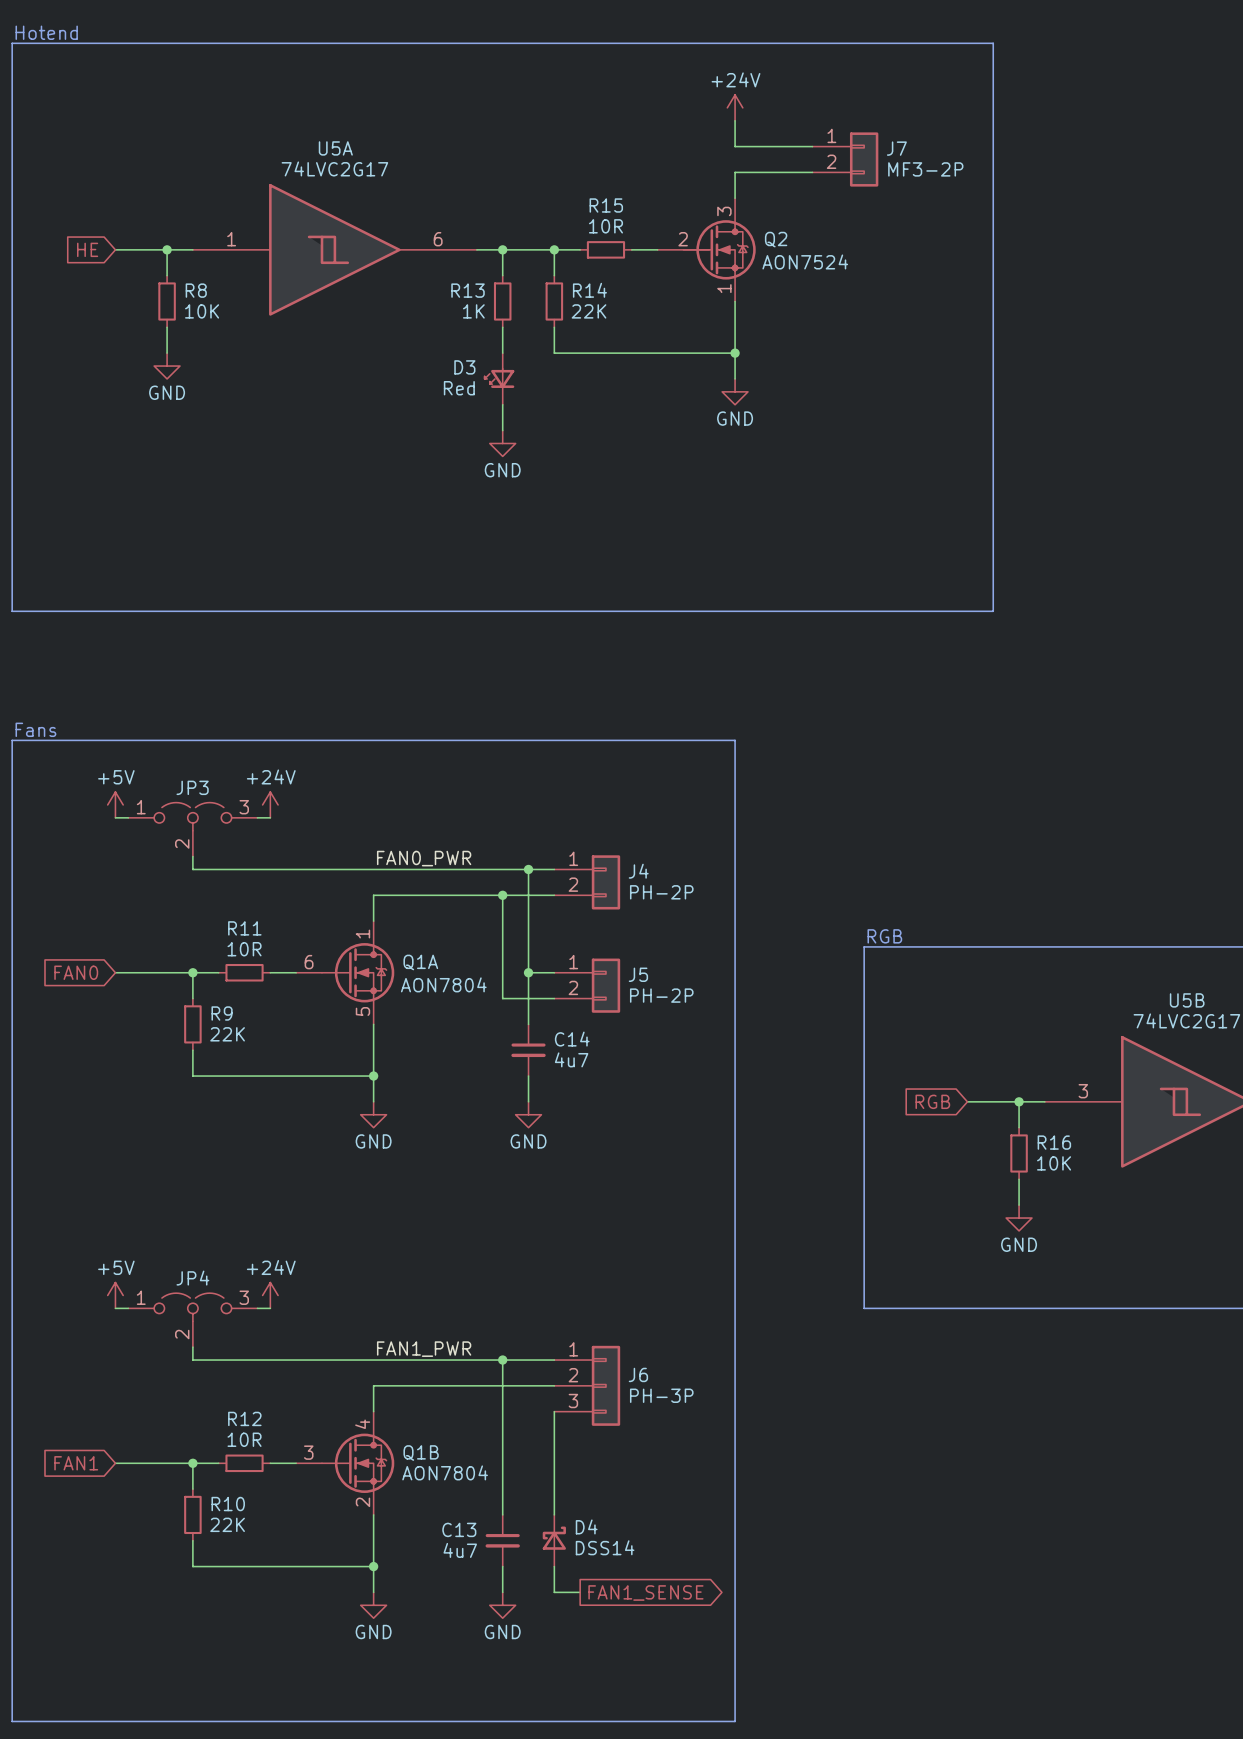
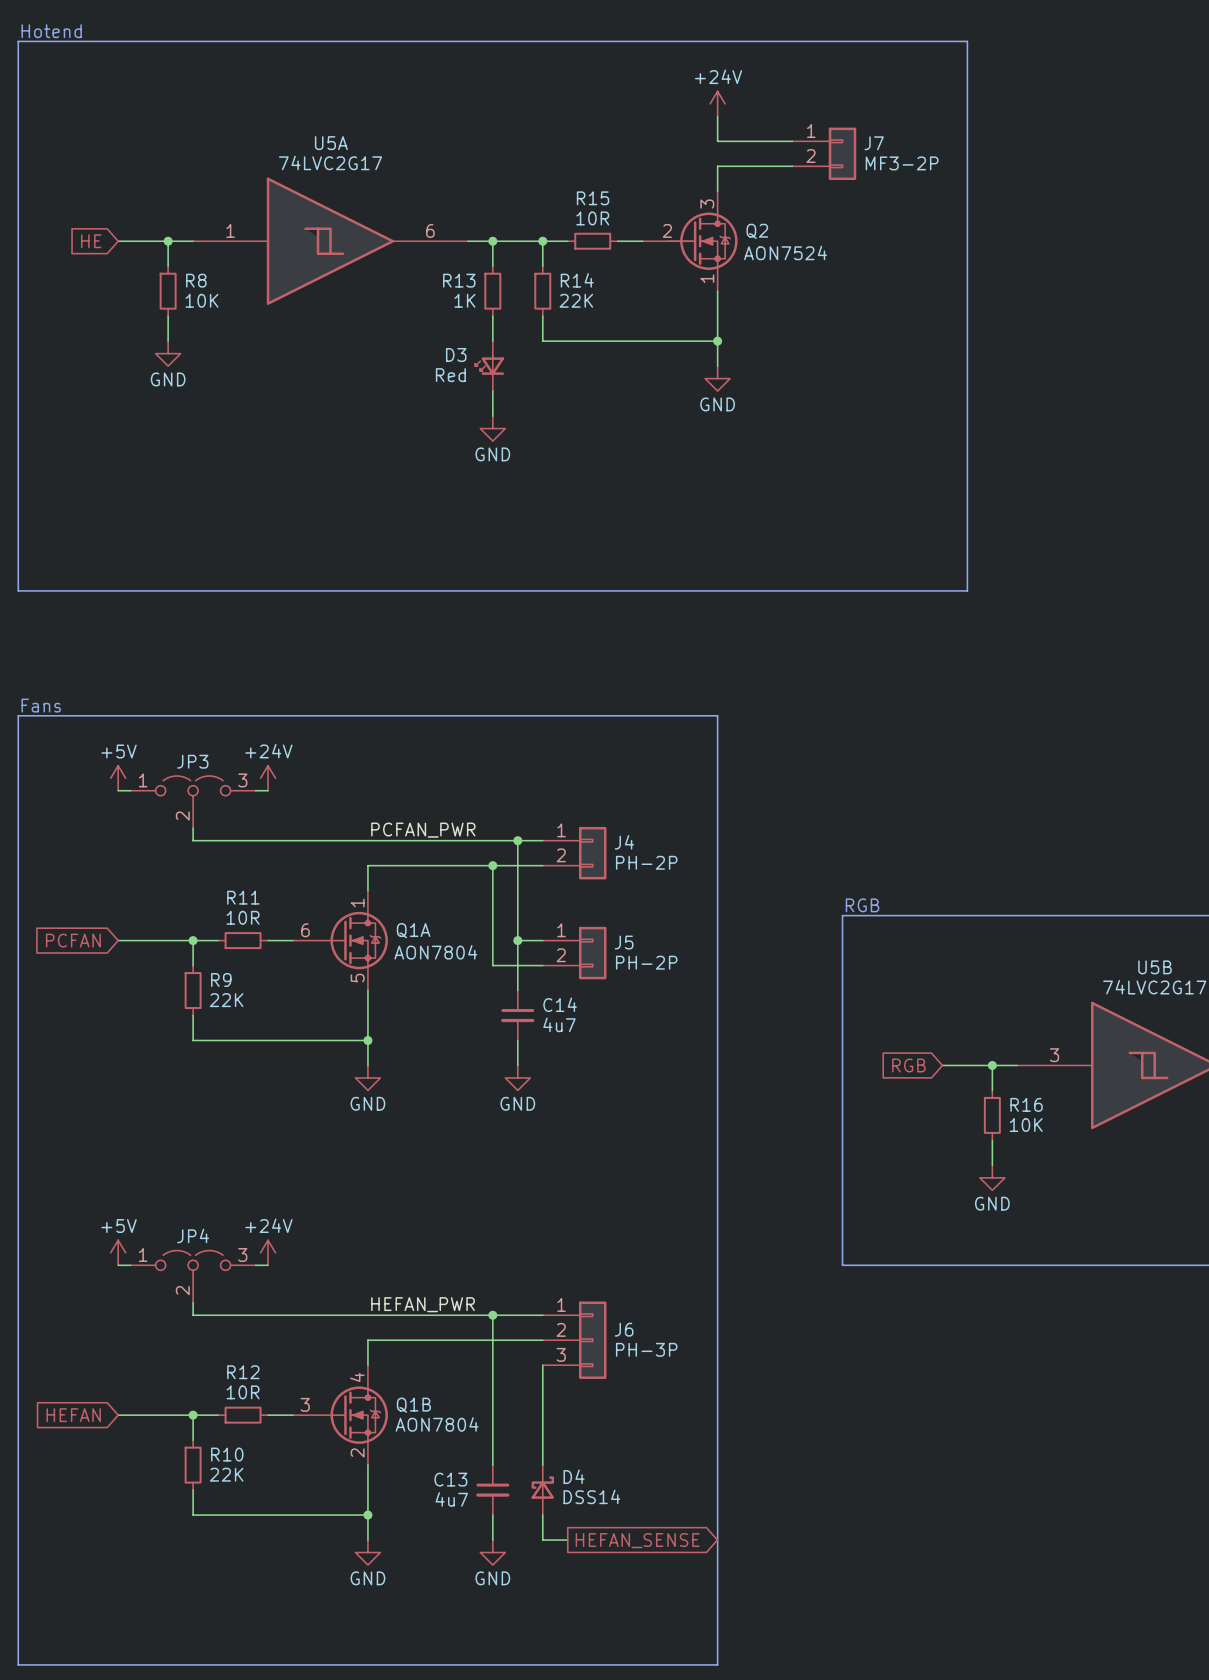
label: FAN0_PWR (424, 858) -> PCFAN_PWR (423, 830)
global label: FAN0 (76, 972) -> PCFAN (73, 940)
label: FAN1_PWR (424, 1349) -> HEFAN_PWR (423, 1304)
global label: FAN1 (76, 1463) -> HEFAN (73, 1415)
global label: FAN1_SENSE (645, 1592) -> HEFAN_SENSE (637, 1540)

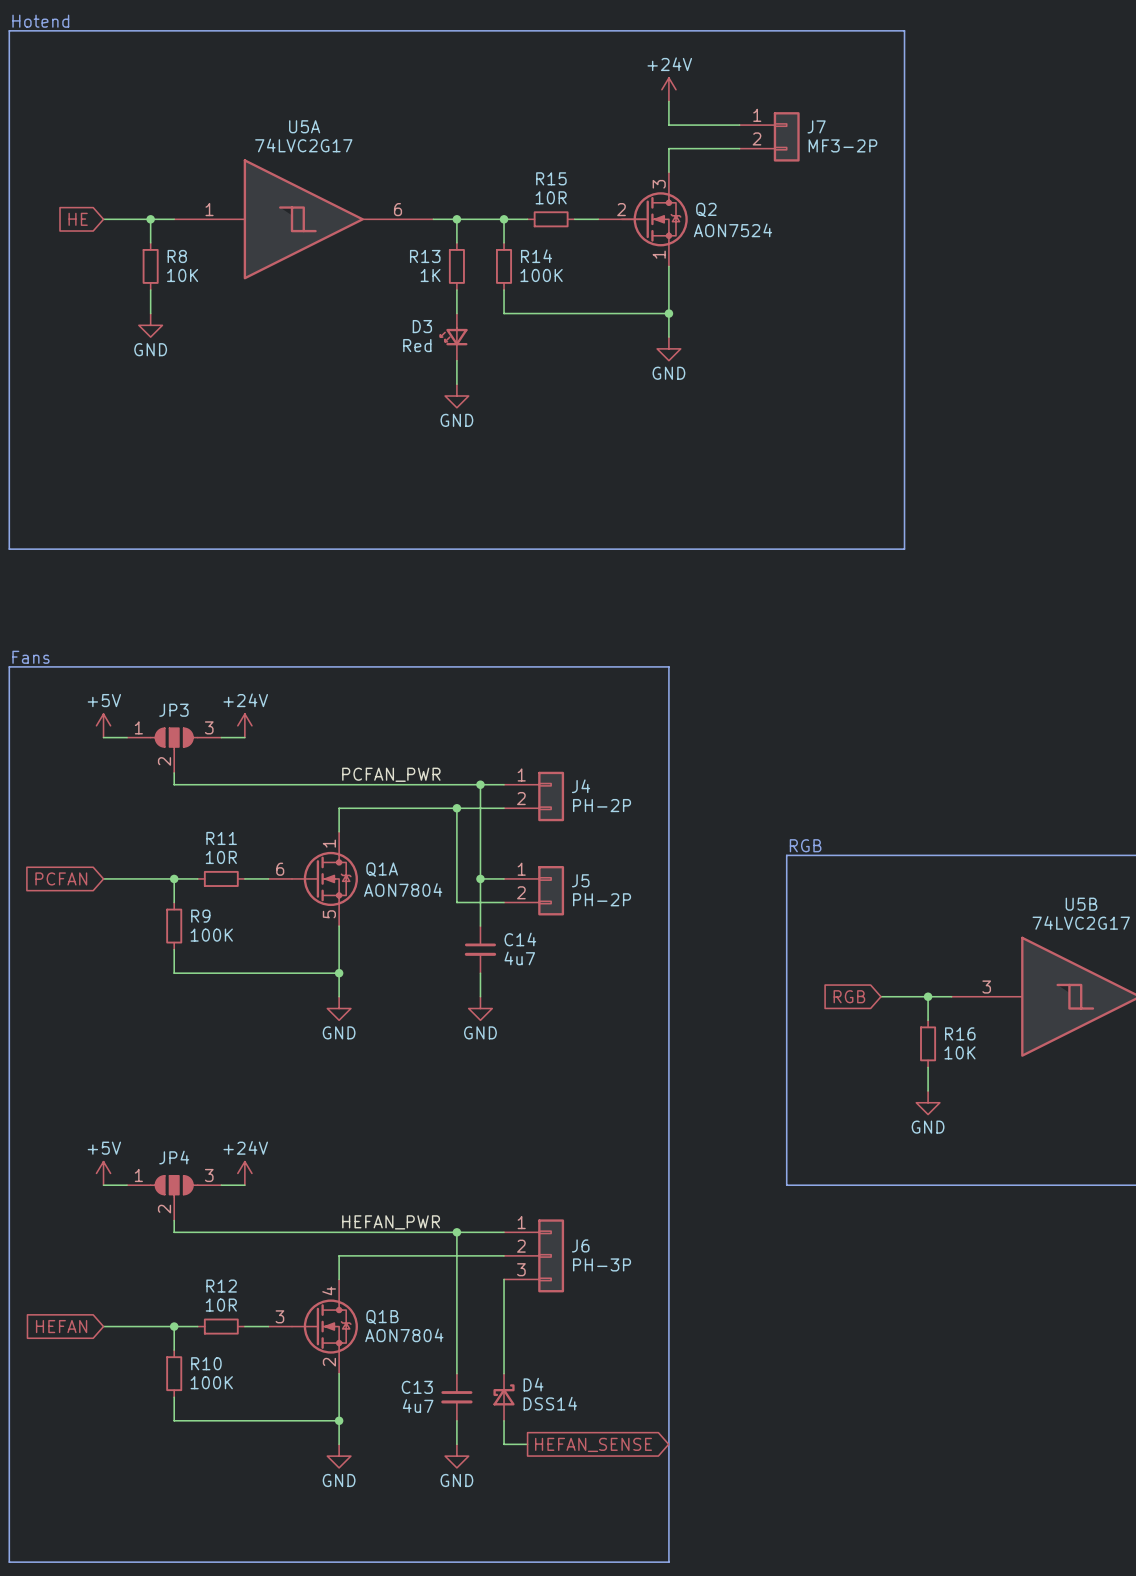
R14 value: 22K (576, 300) -> 100K (541, 275)
JP3 symbol: [130, 775, 256, 829] -> [127, 728, 222, 773]
R9 value: 22K (226, 1000) -> 100K (211, 935)
JP4 symbol: [130, 1250, 256, 1303] -> [127, 1175, 222, 1221]
R10 value: 22K (226, 1474) -> 100K (211, 1382)

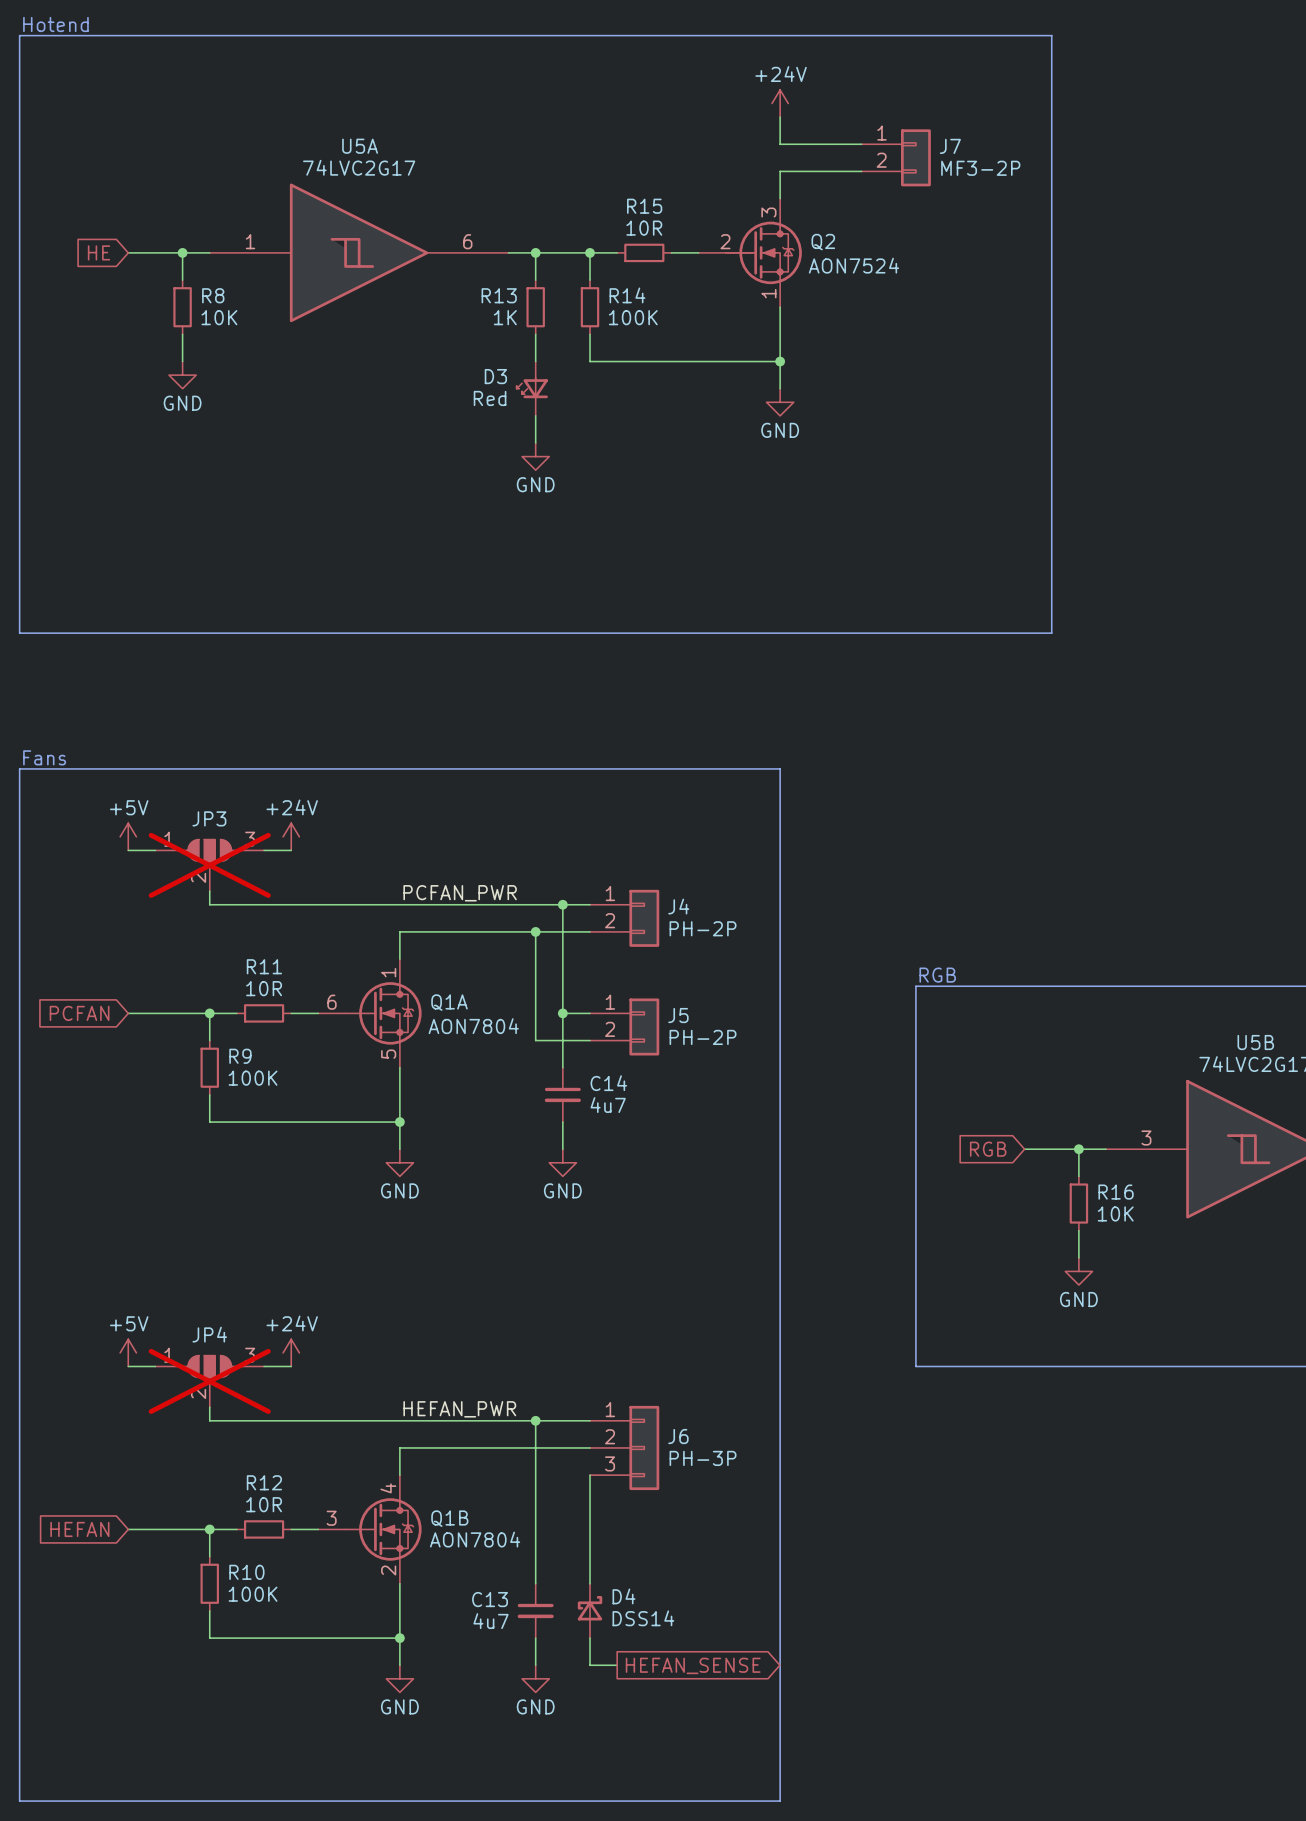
JP3 do-not-place cross: none -> (209, 865)
JP4 do-not-place cross: none -> (209, 1381)

